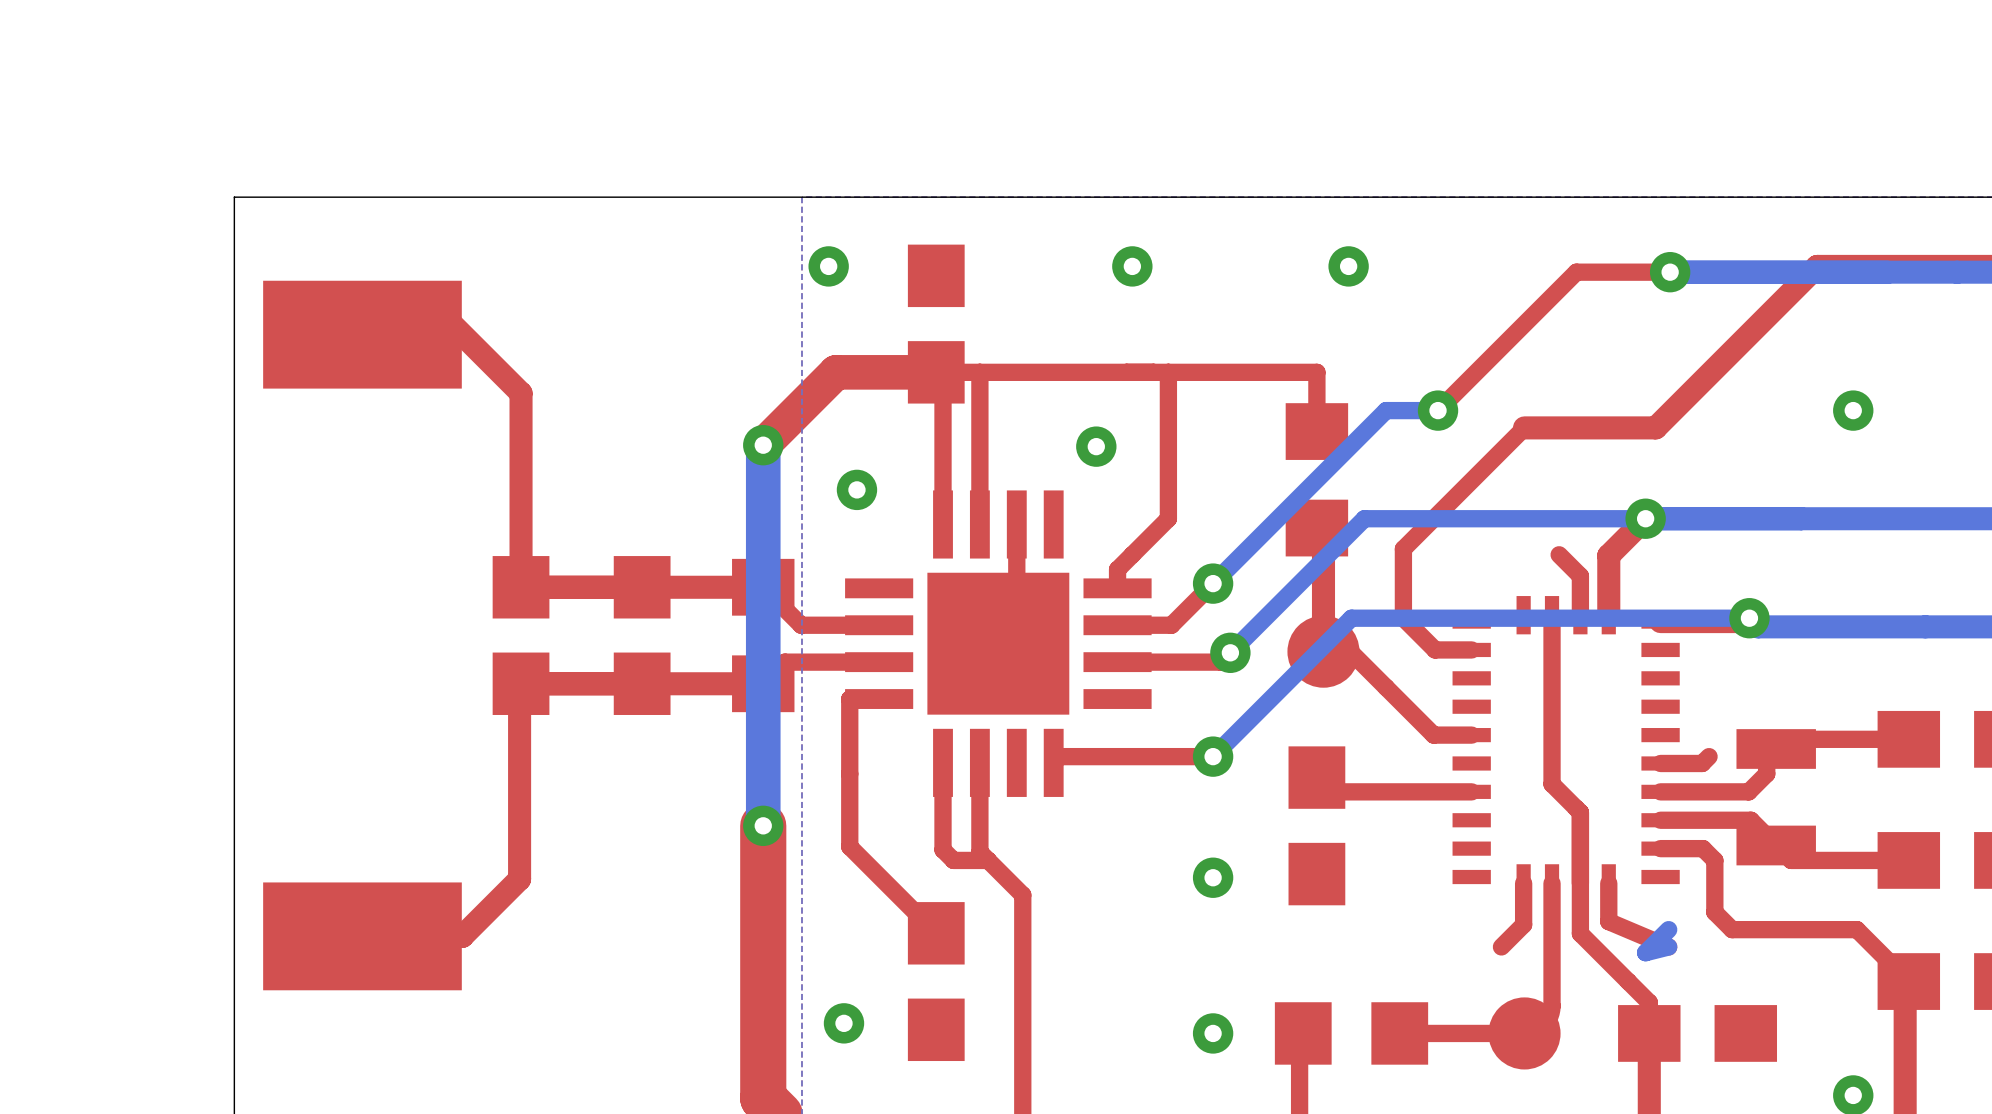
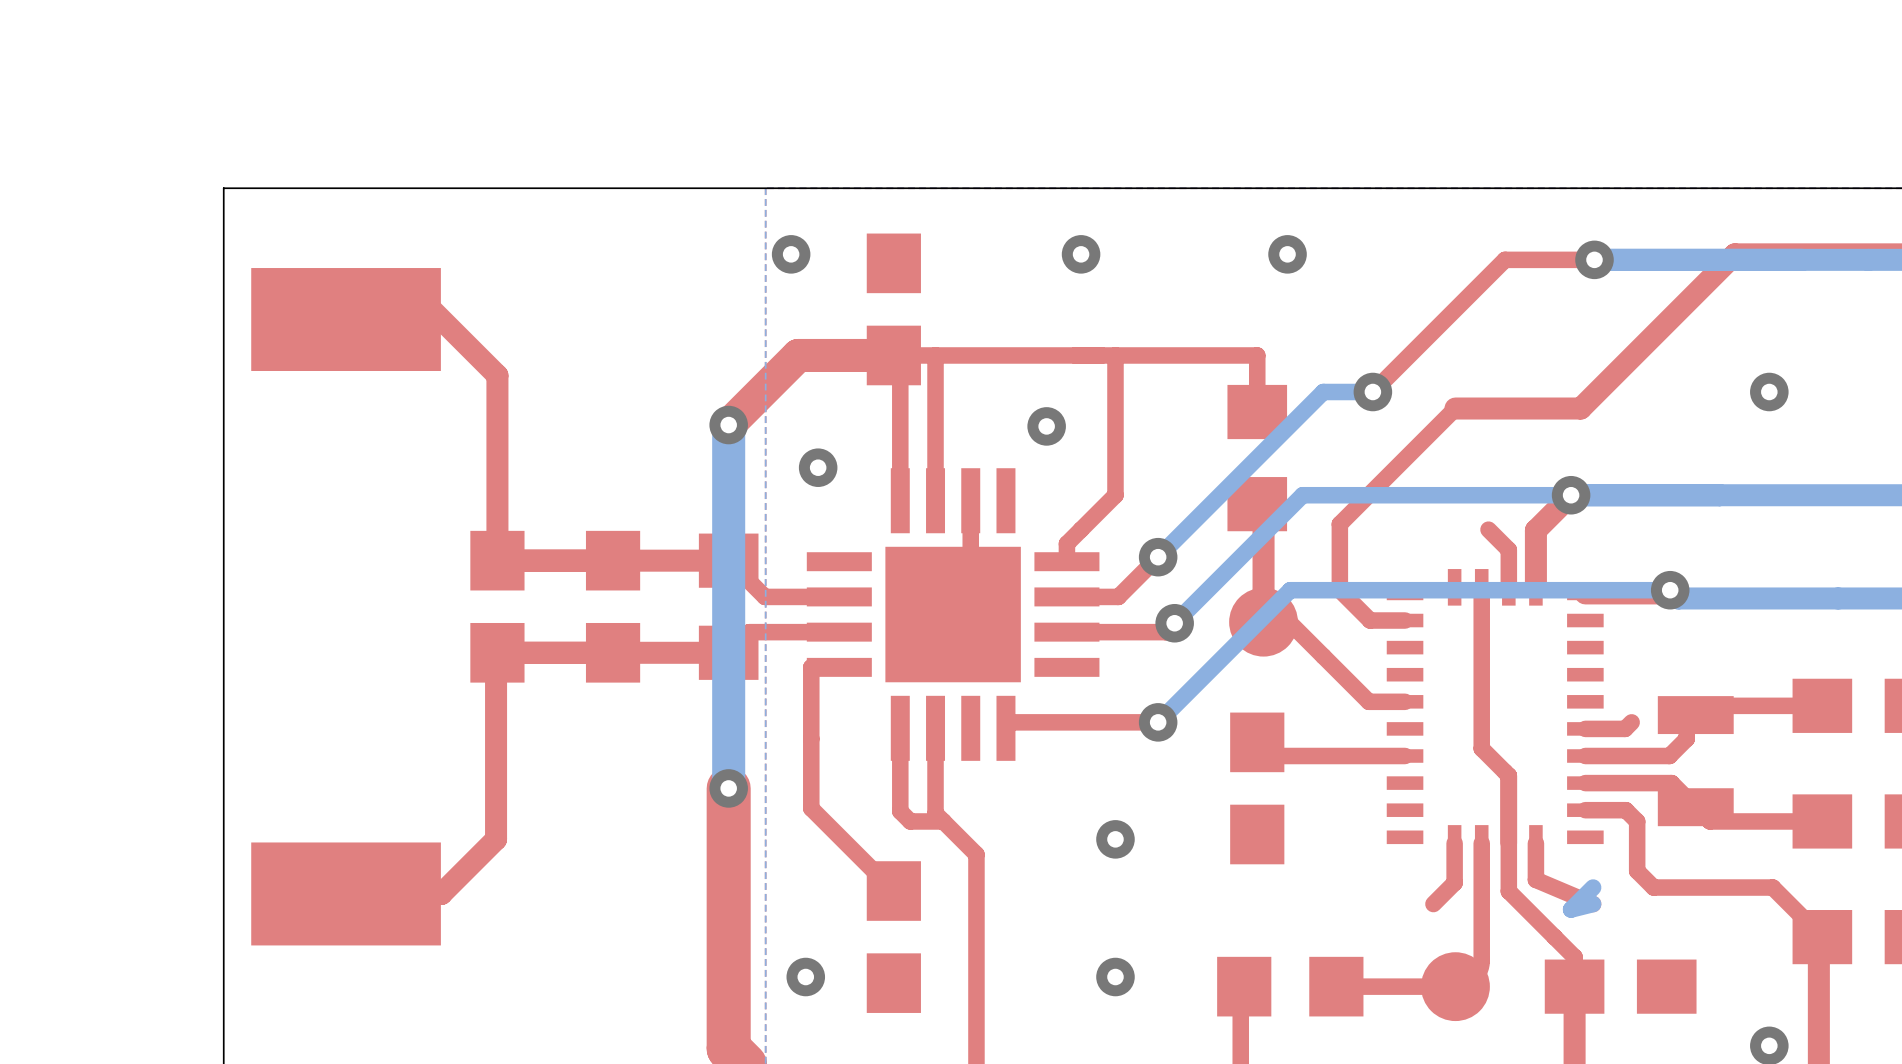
via position: (1213, 877) -> (1115, 839)
via position: (1213, 1033) -> (1115, 977)

